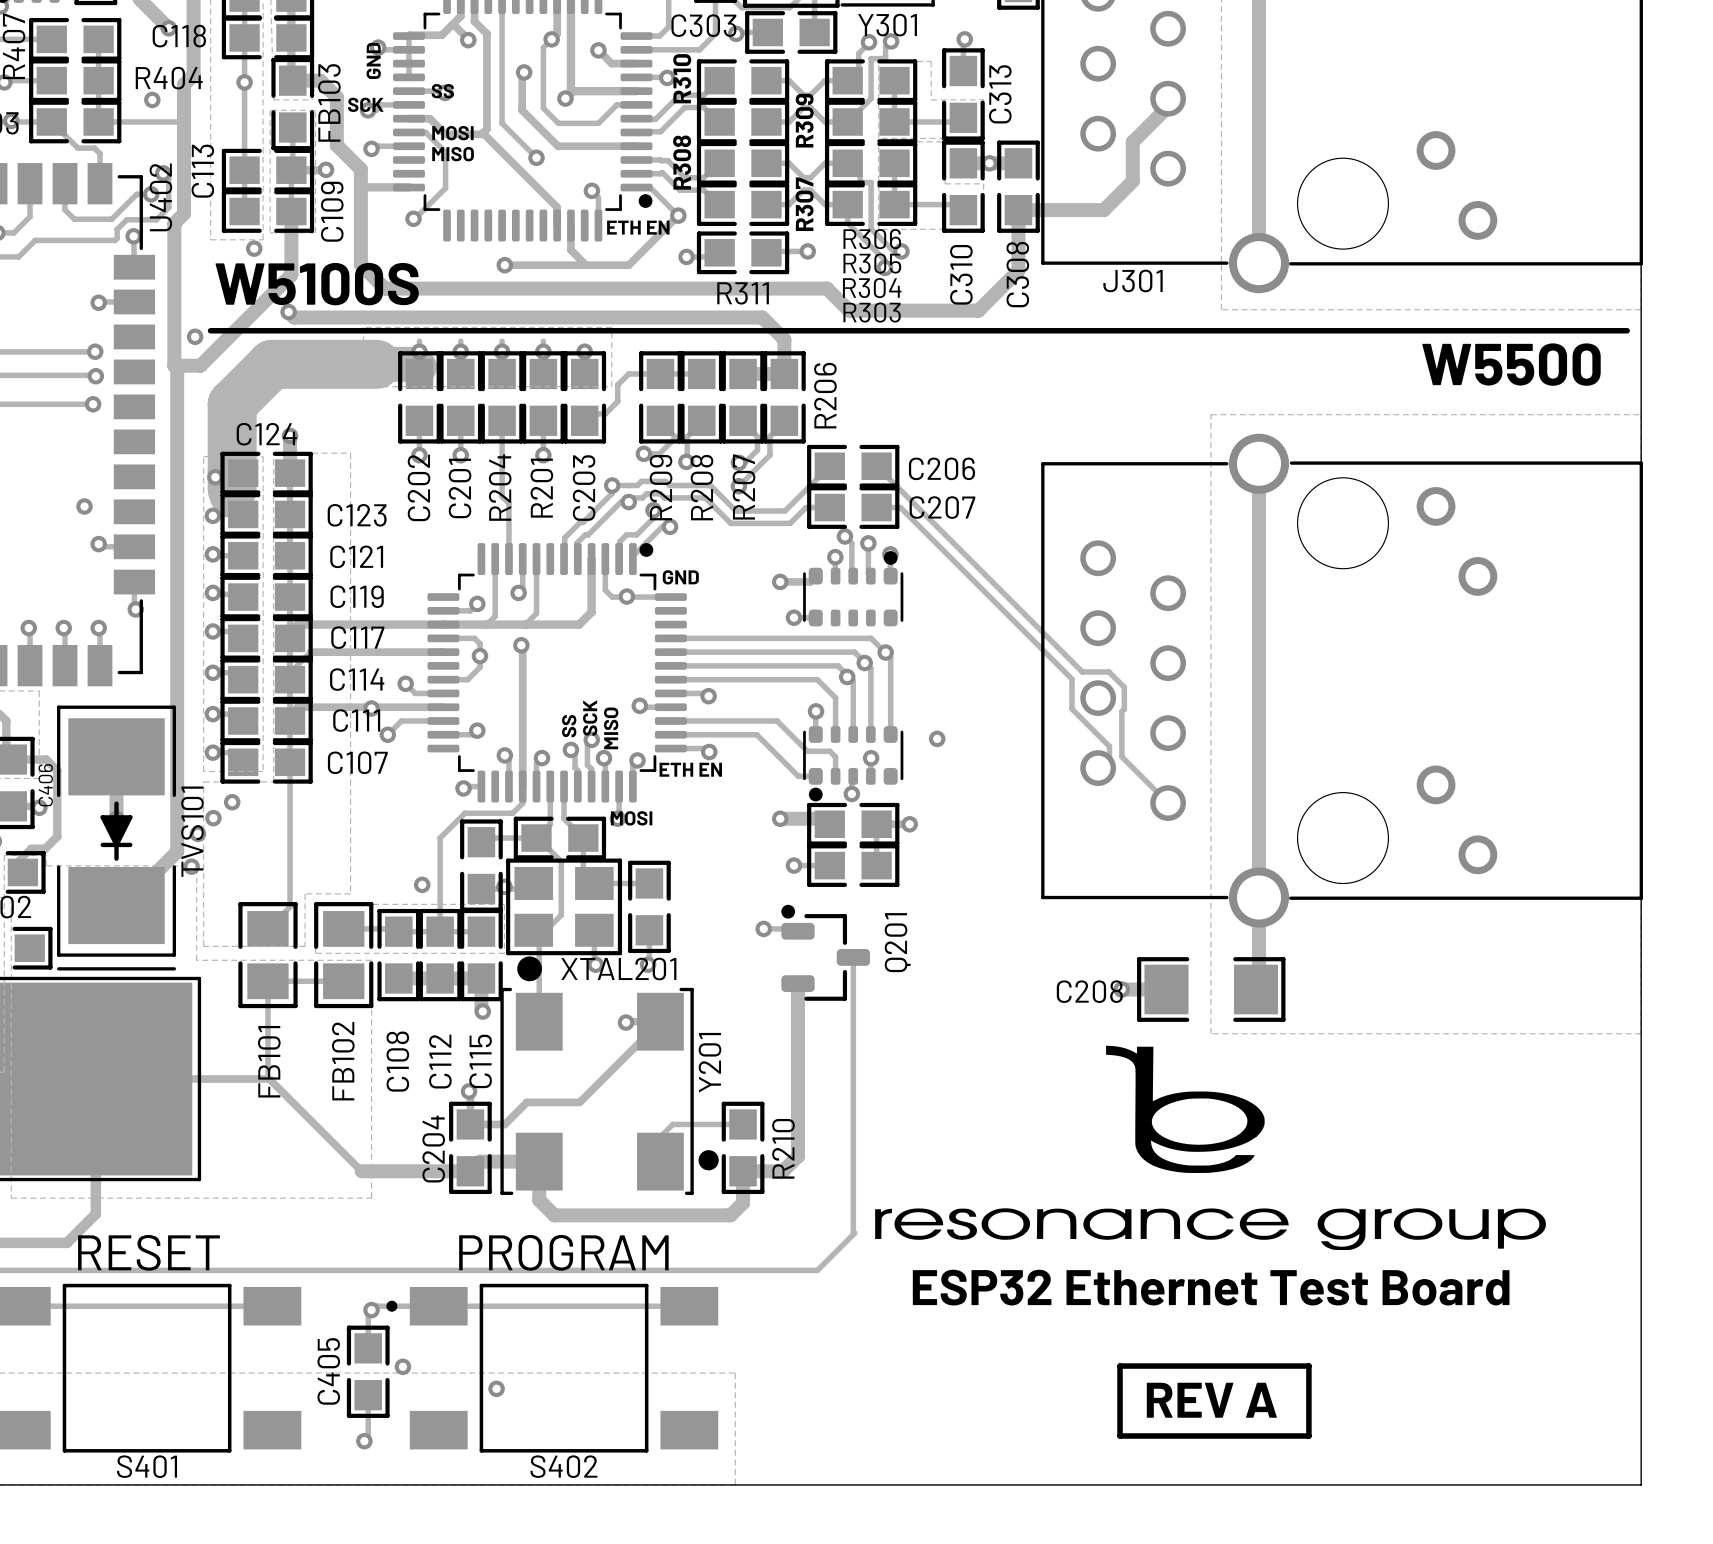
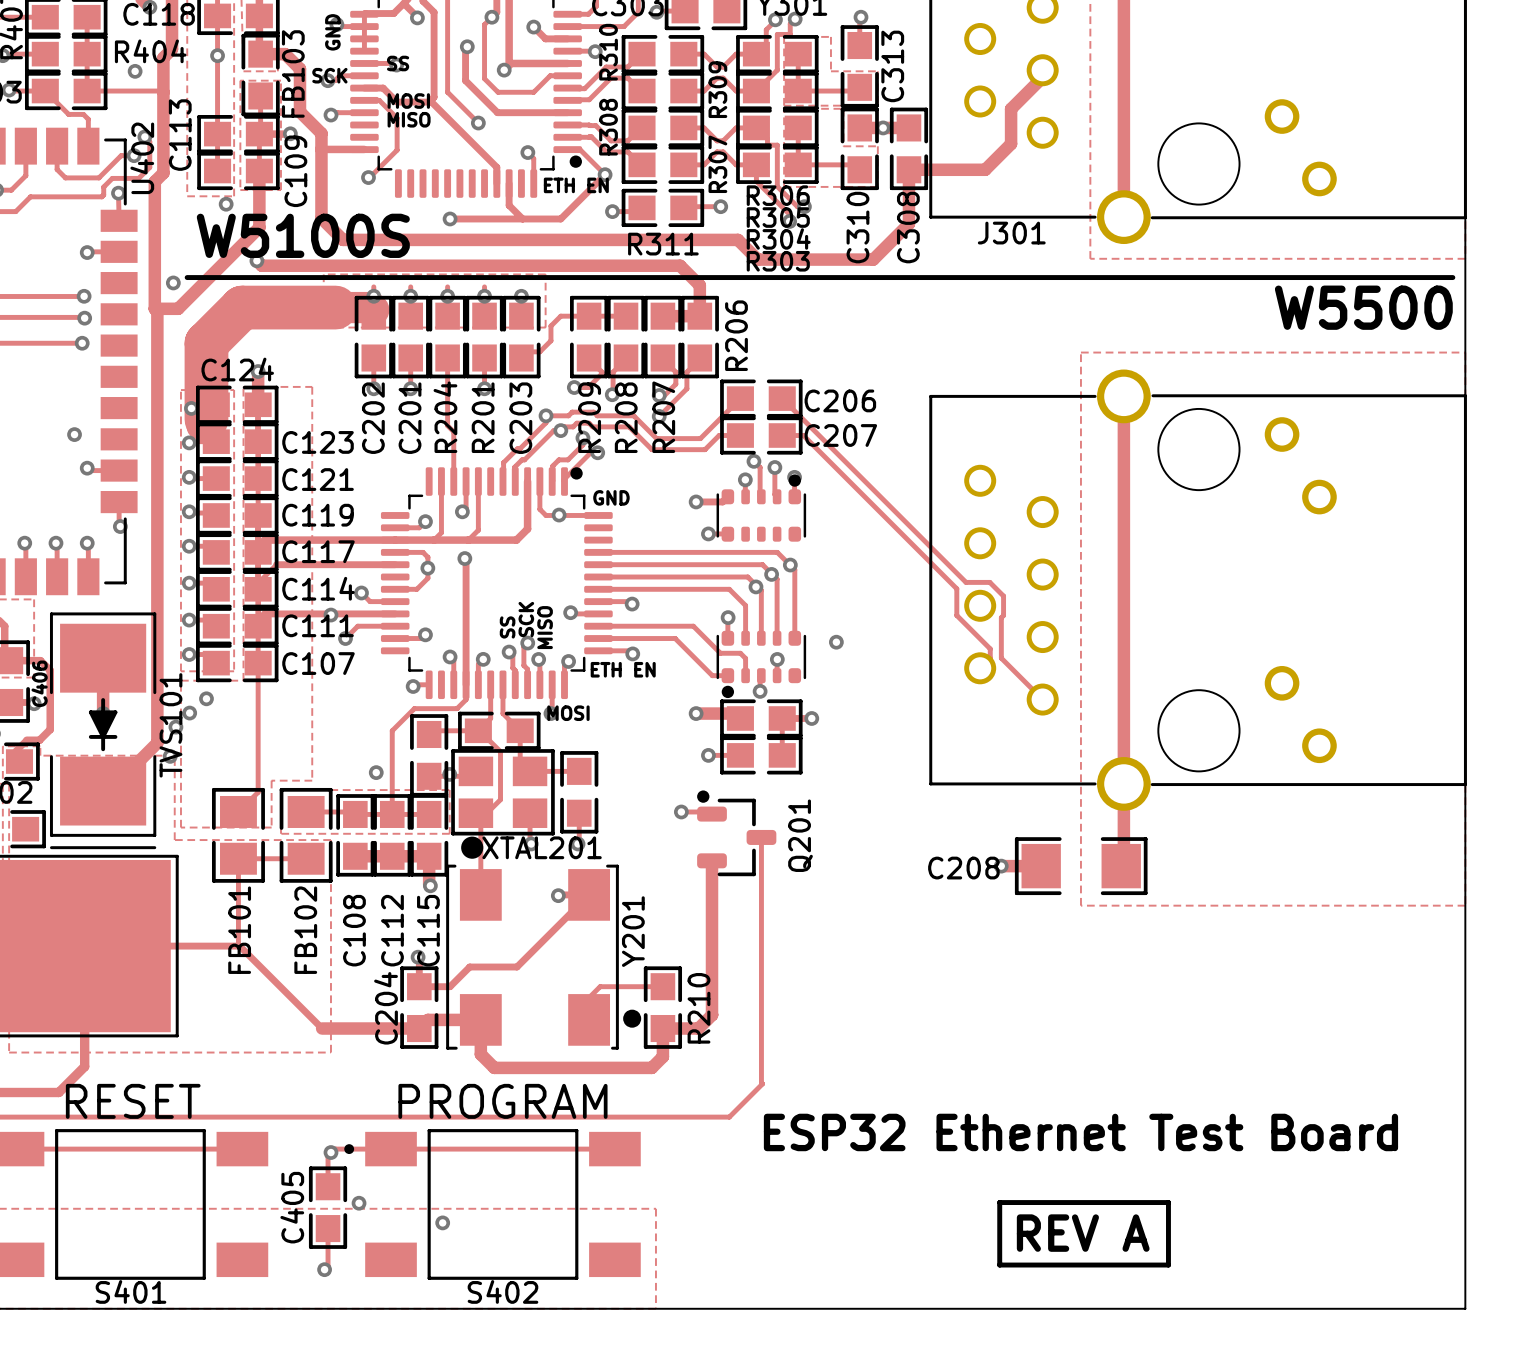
drawing: [875, 1045, 1546, 1251] -> none

